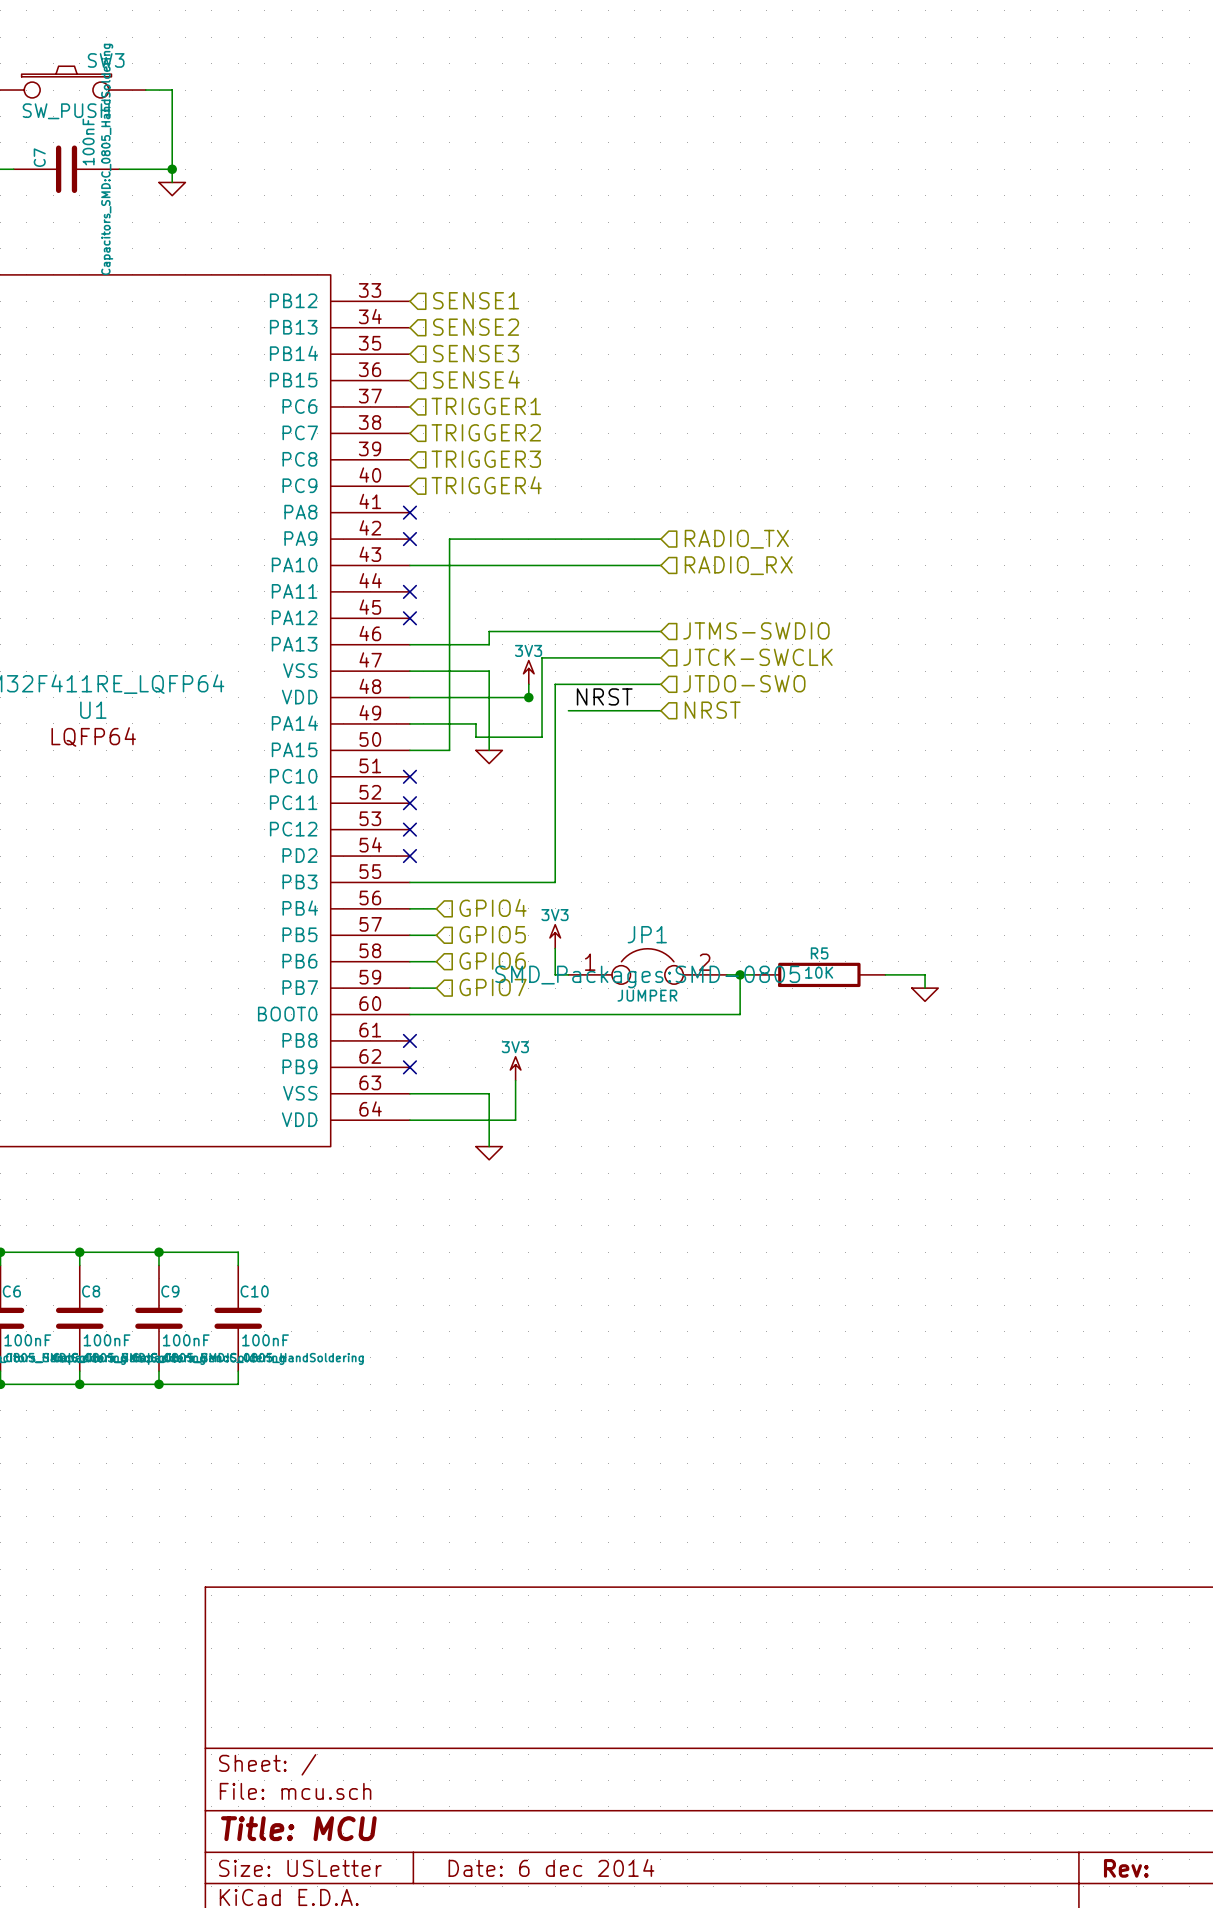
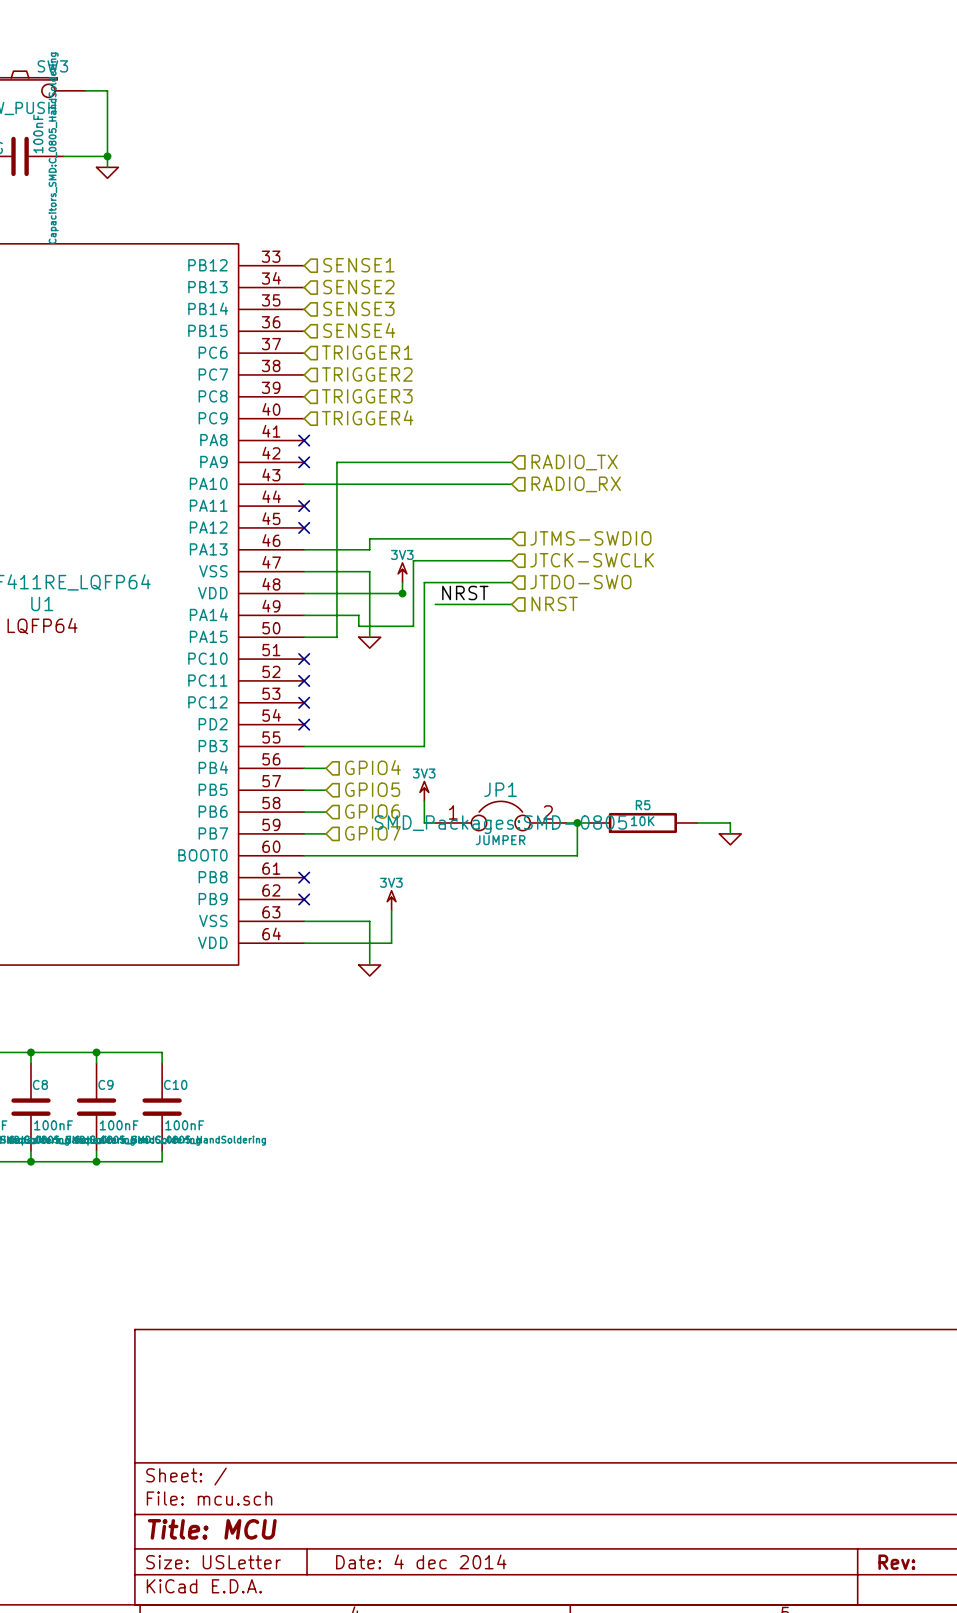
title block: Date: 6 dec 2014 (551, 1867) -> Date: 4 dec 2014 (421, 1561)

